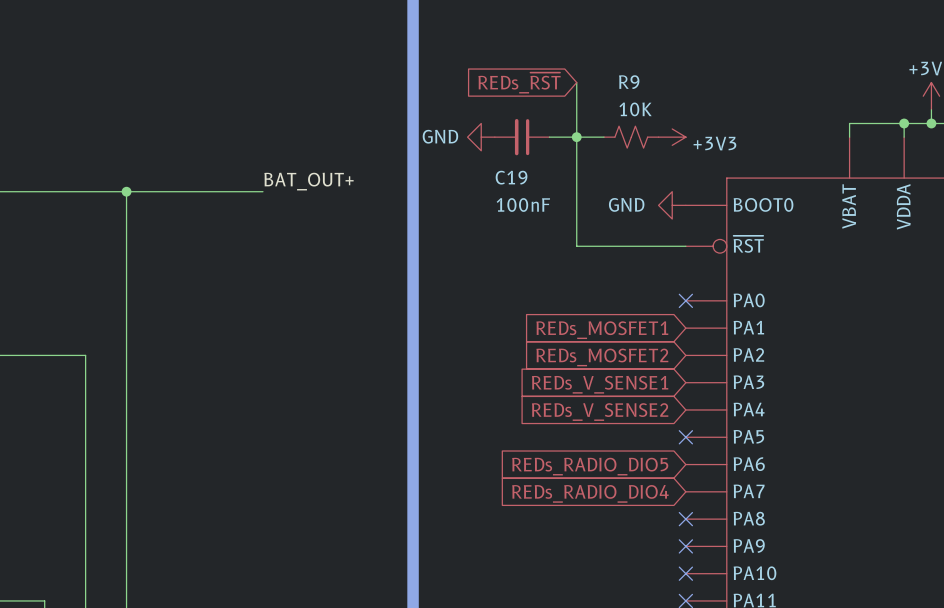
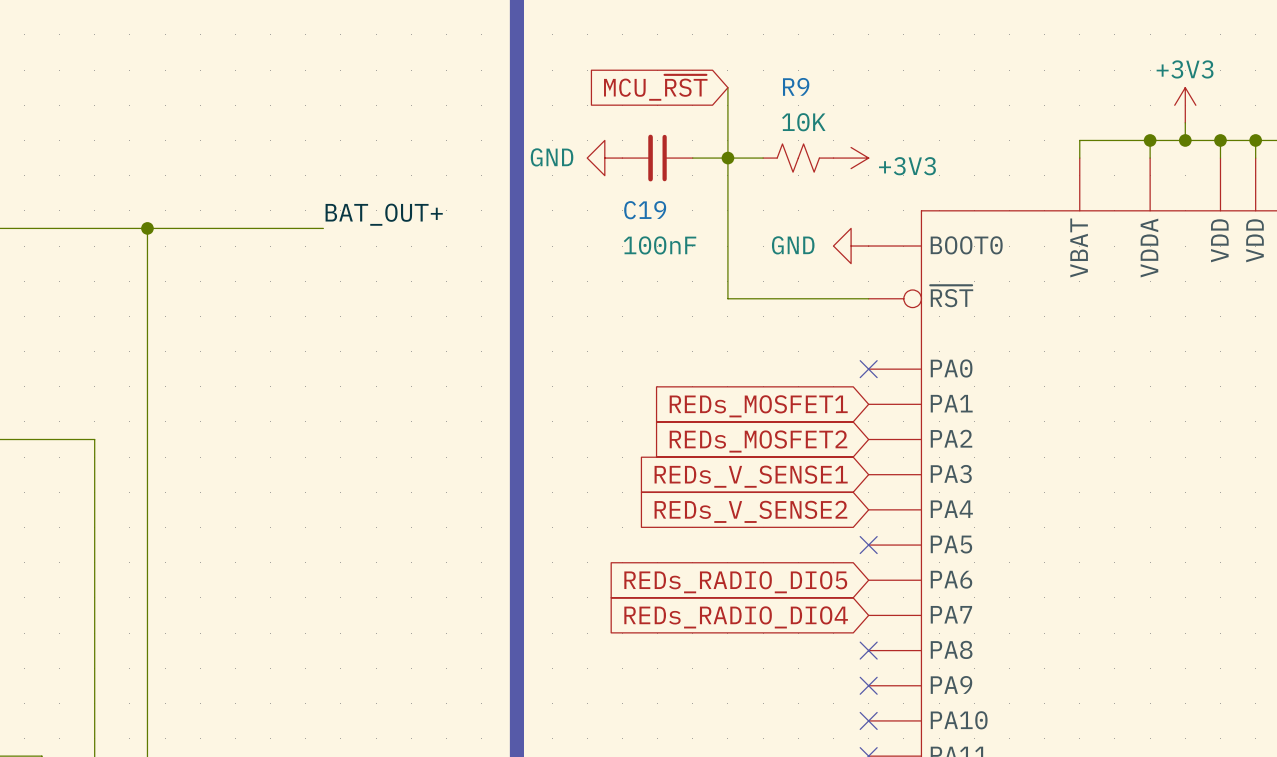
global label: REDs_~{RST} (519, 83) -> MCU_~{RST} (655, 87)

